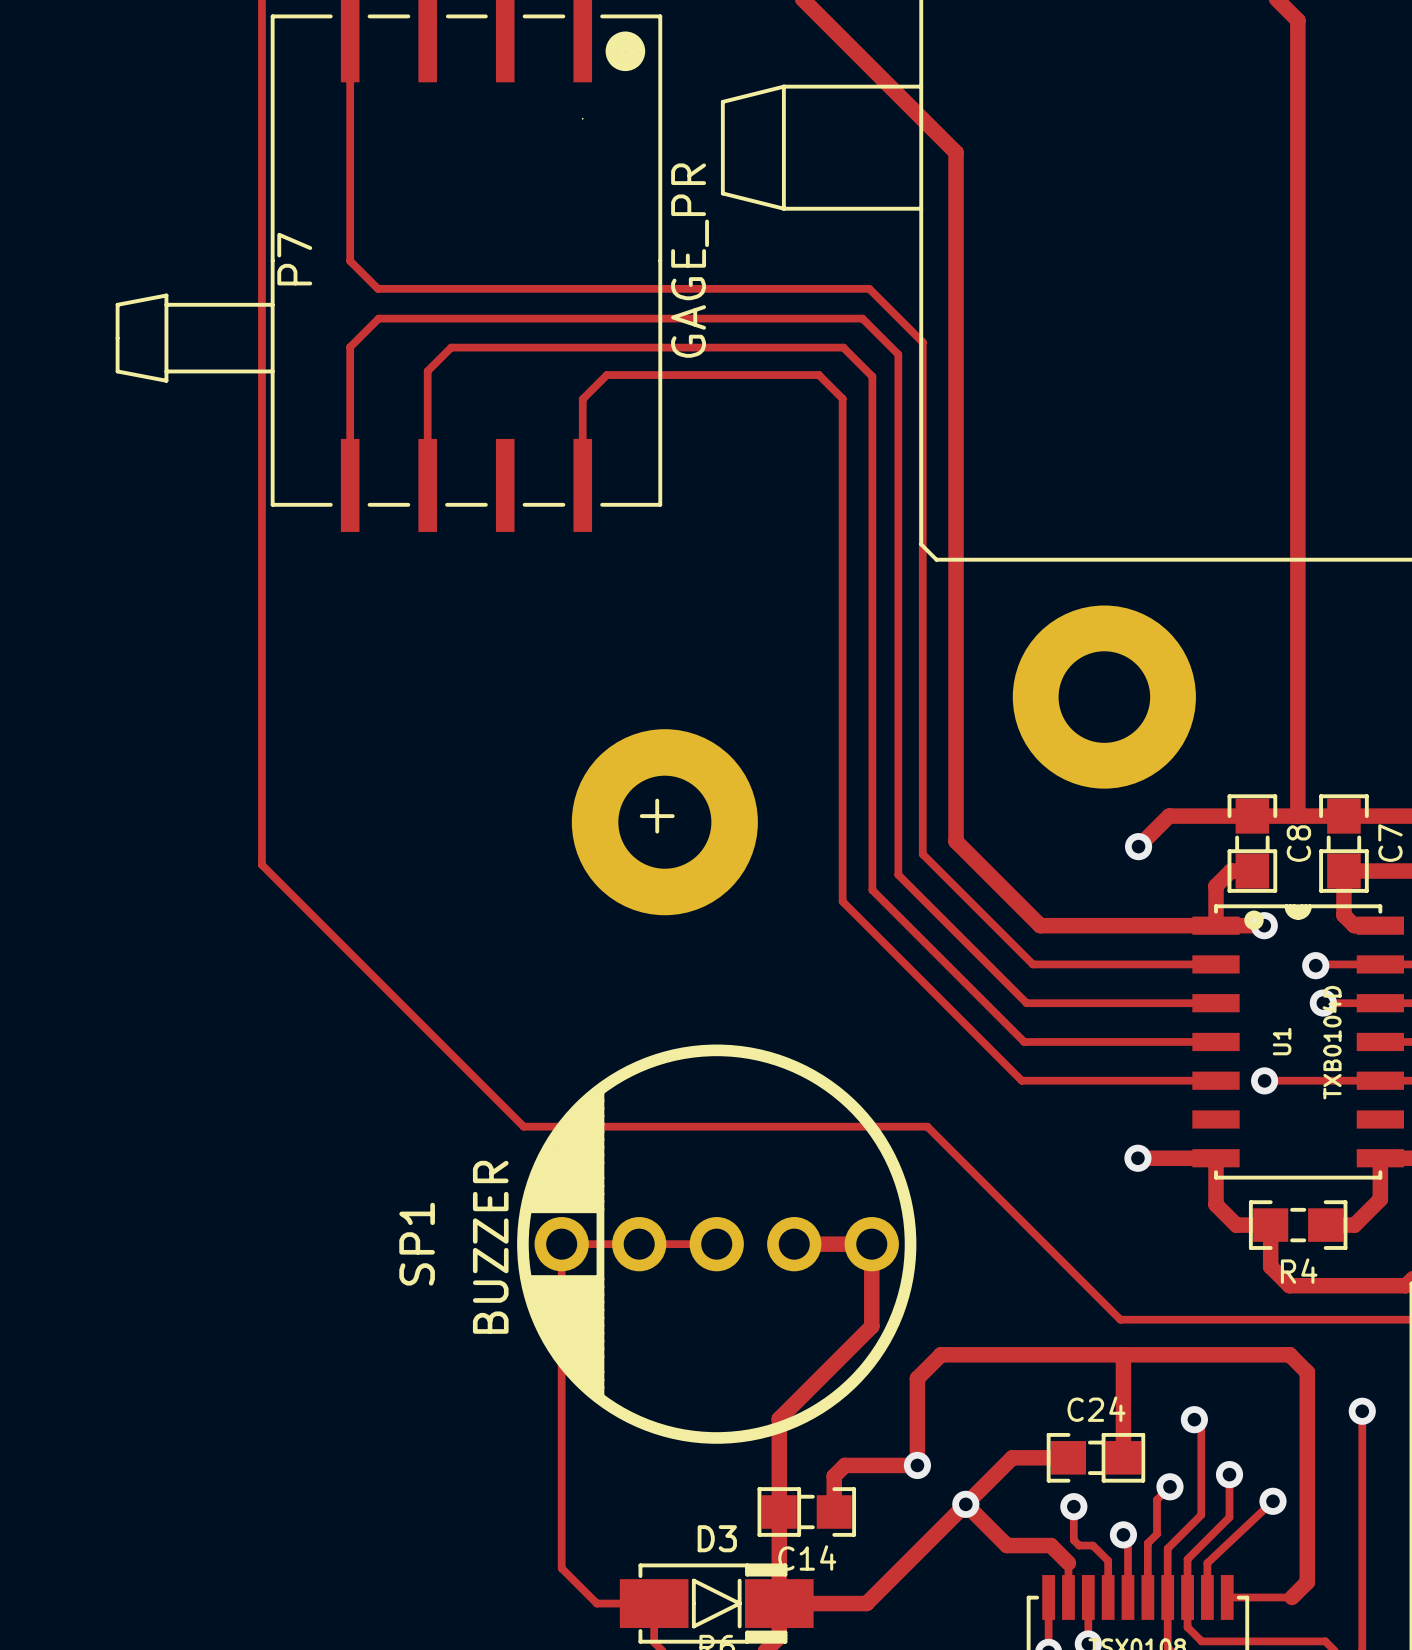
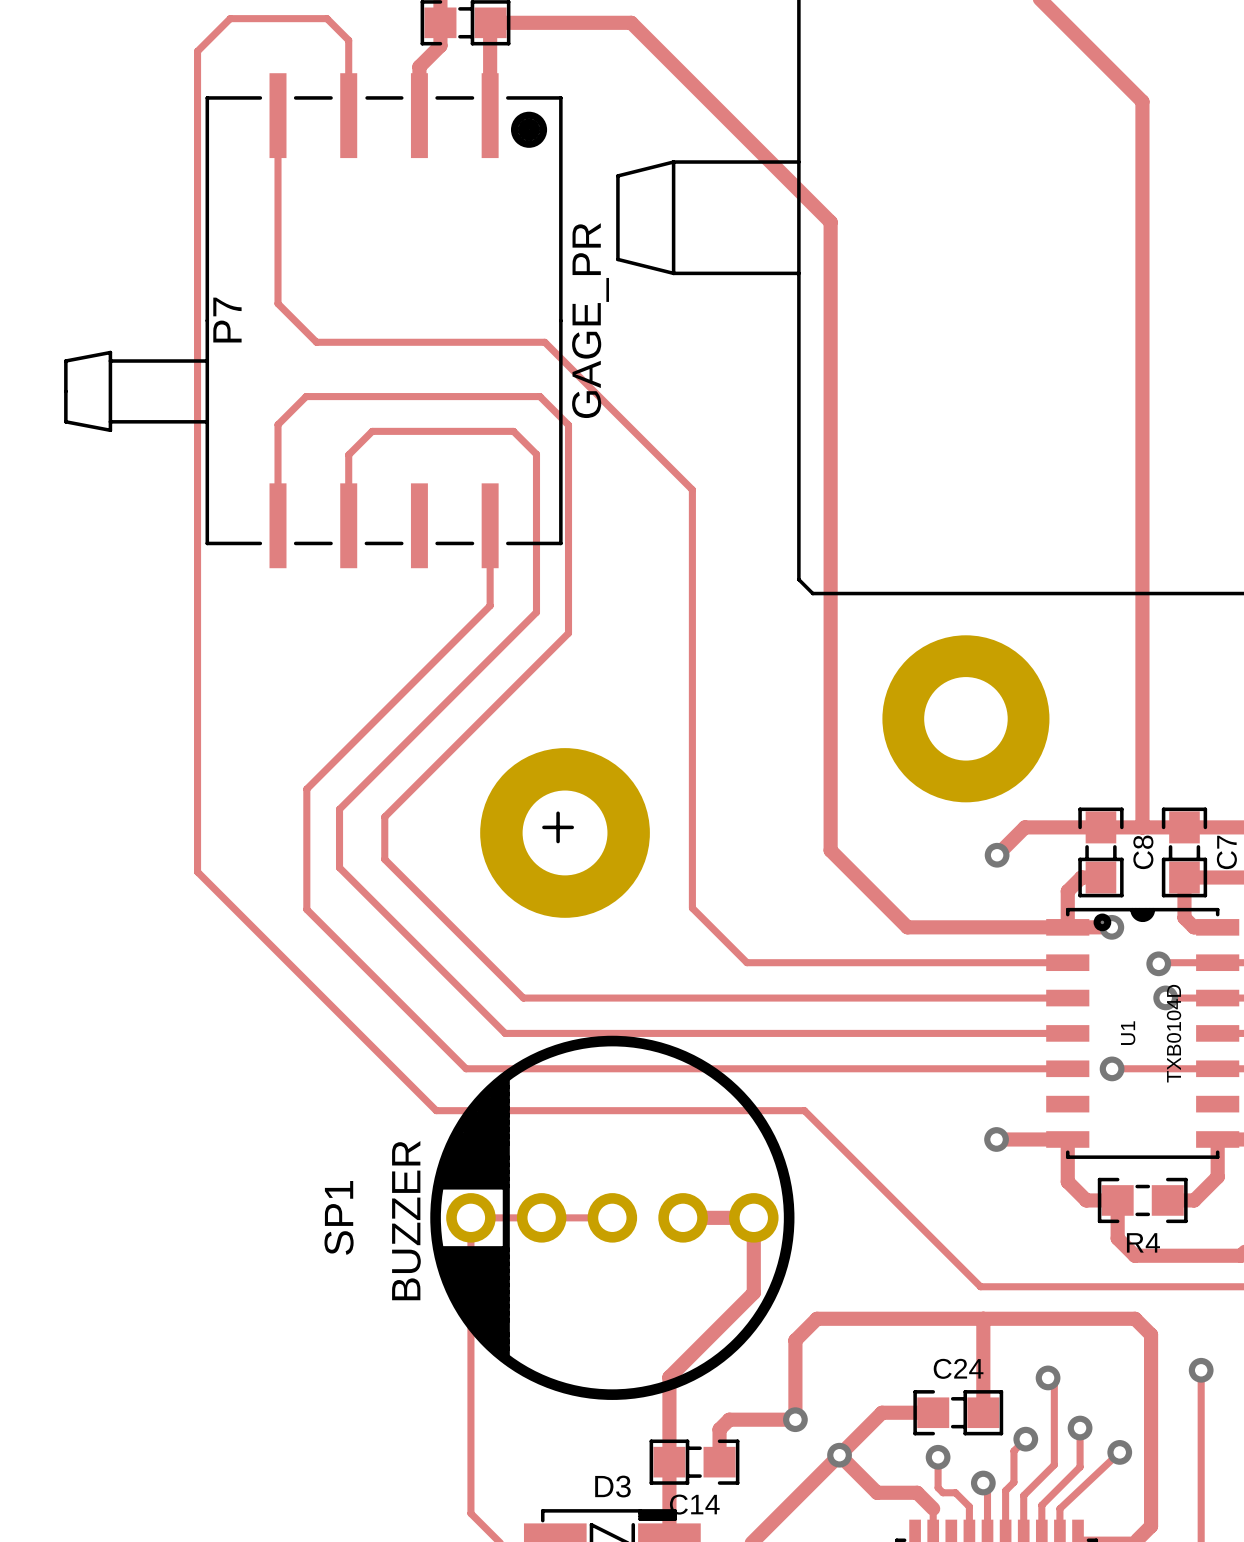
track: (350, 241) (350, 261) (377, 288) (869, 288) (922, 342) (922, 854) (1032, 964) -> (278, 303) (316, 342) (544, 342) (692, 489) (692, 908) (746, 962) (900, 962)
track: (350, 374) (350, 347) (378, 318) (862, 318) (898, 354) (898, 874) (1026, 1003) -> (278, 424) (306, 396) (539, 396) (568, 425) (568, 633) (384, 816) (384, 859) (523, 998) (895, 998)
track: (427, 407) (427, 371) (451, 347) (843, 347) (872, 376) (872, 890) (1024, 1041) -> (348, 454) (372, 431) (513, 431) (536, 454) (536, 612) (339, 809) (339, 867) (505, 1033) (892, 1033)
track: (582, 485) (582, 399) (606, 375) (818, 375) (842, 398) (842, 901) (1021, 1080) -> (490, 525) (490, 605) (306, 789) (306, 909) (466, 1068) (890, 1068)

